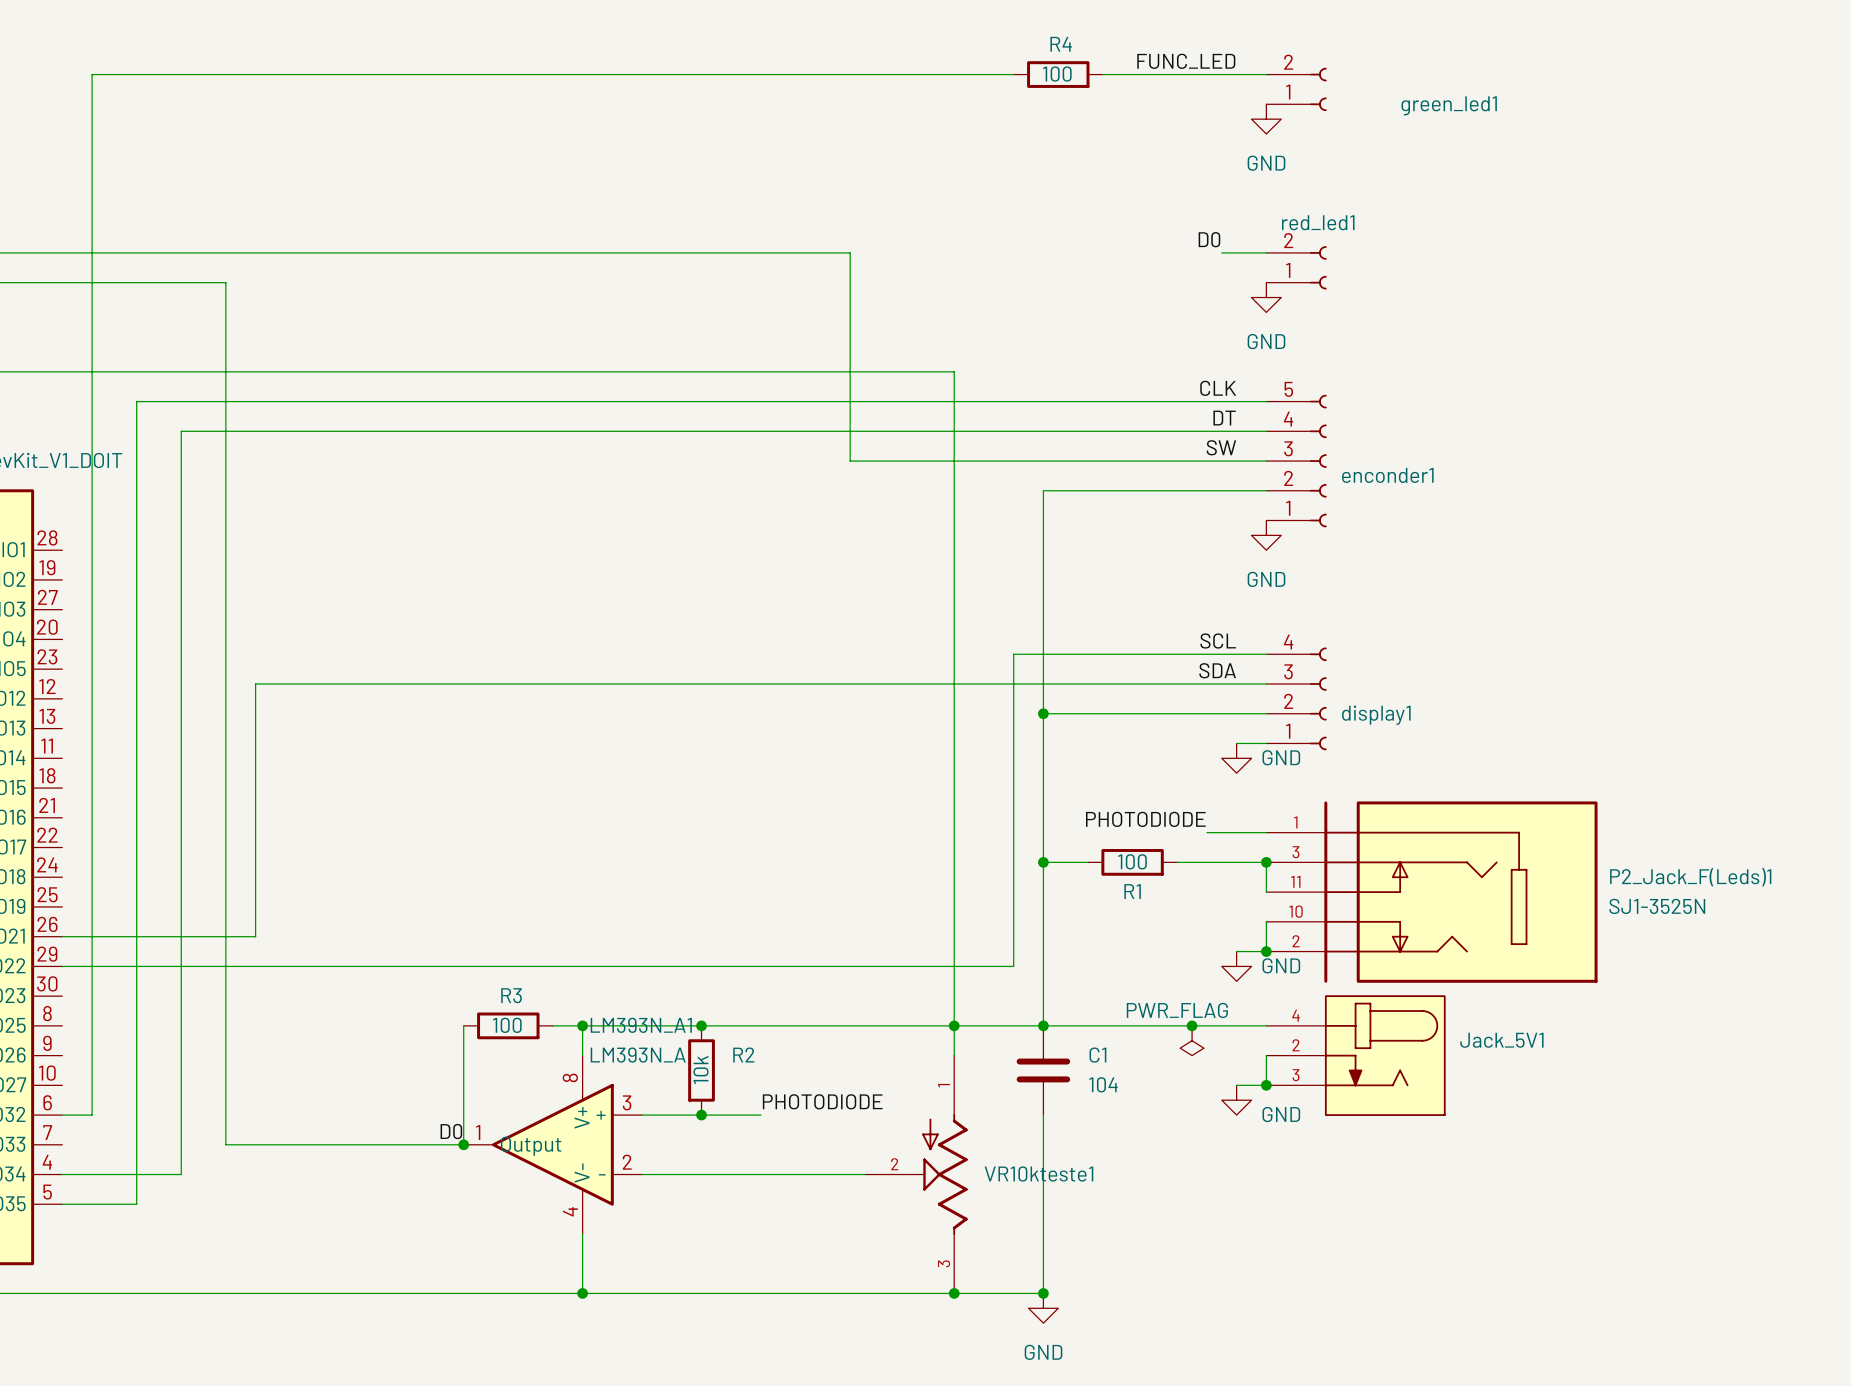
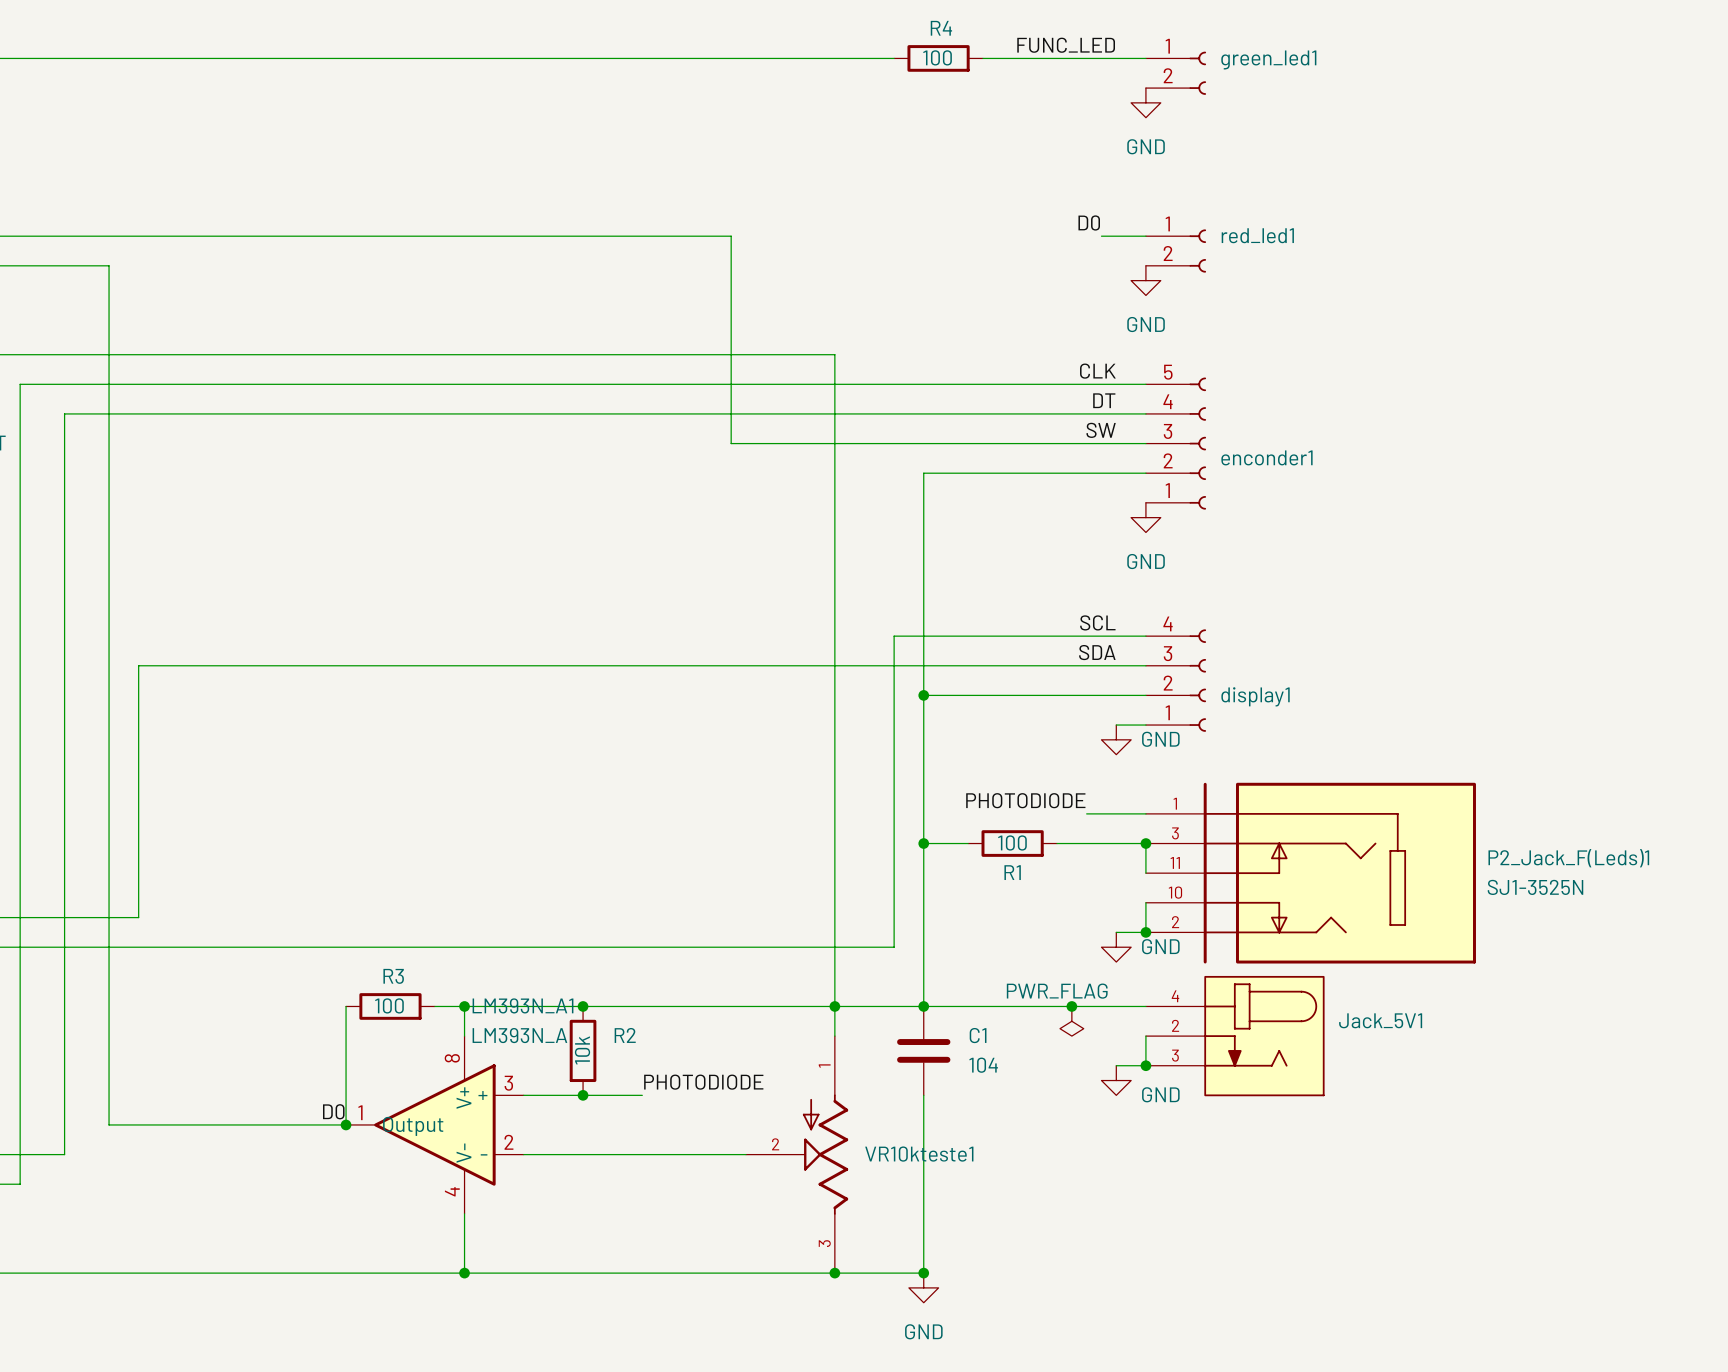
green_led1 flip: as is (1318, 89) -> up-down (1197, 73)
green_led1 name position: green_led1 (1449, 105) -> green_led1 (1268, 59)
red_led1 name position: red_led1 (1318, 222) -> red_led1 (1257, 235)
red_led1 flip: as is (1318, 267) -> up-down (1197, 251)

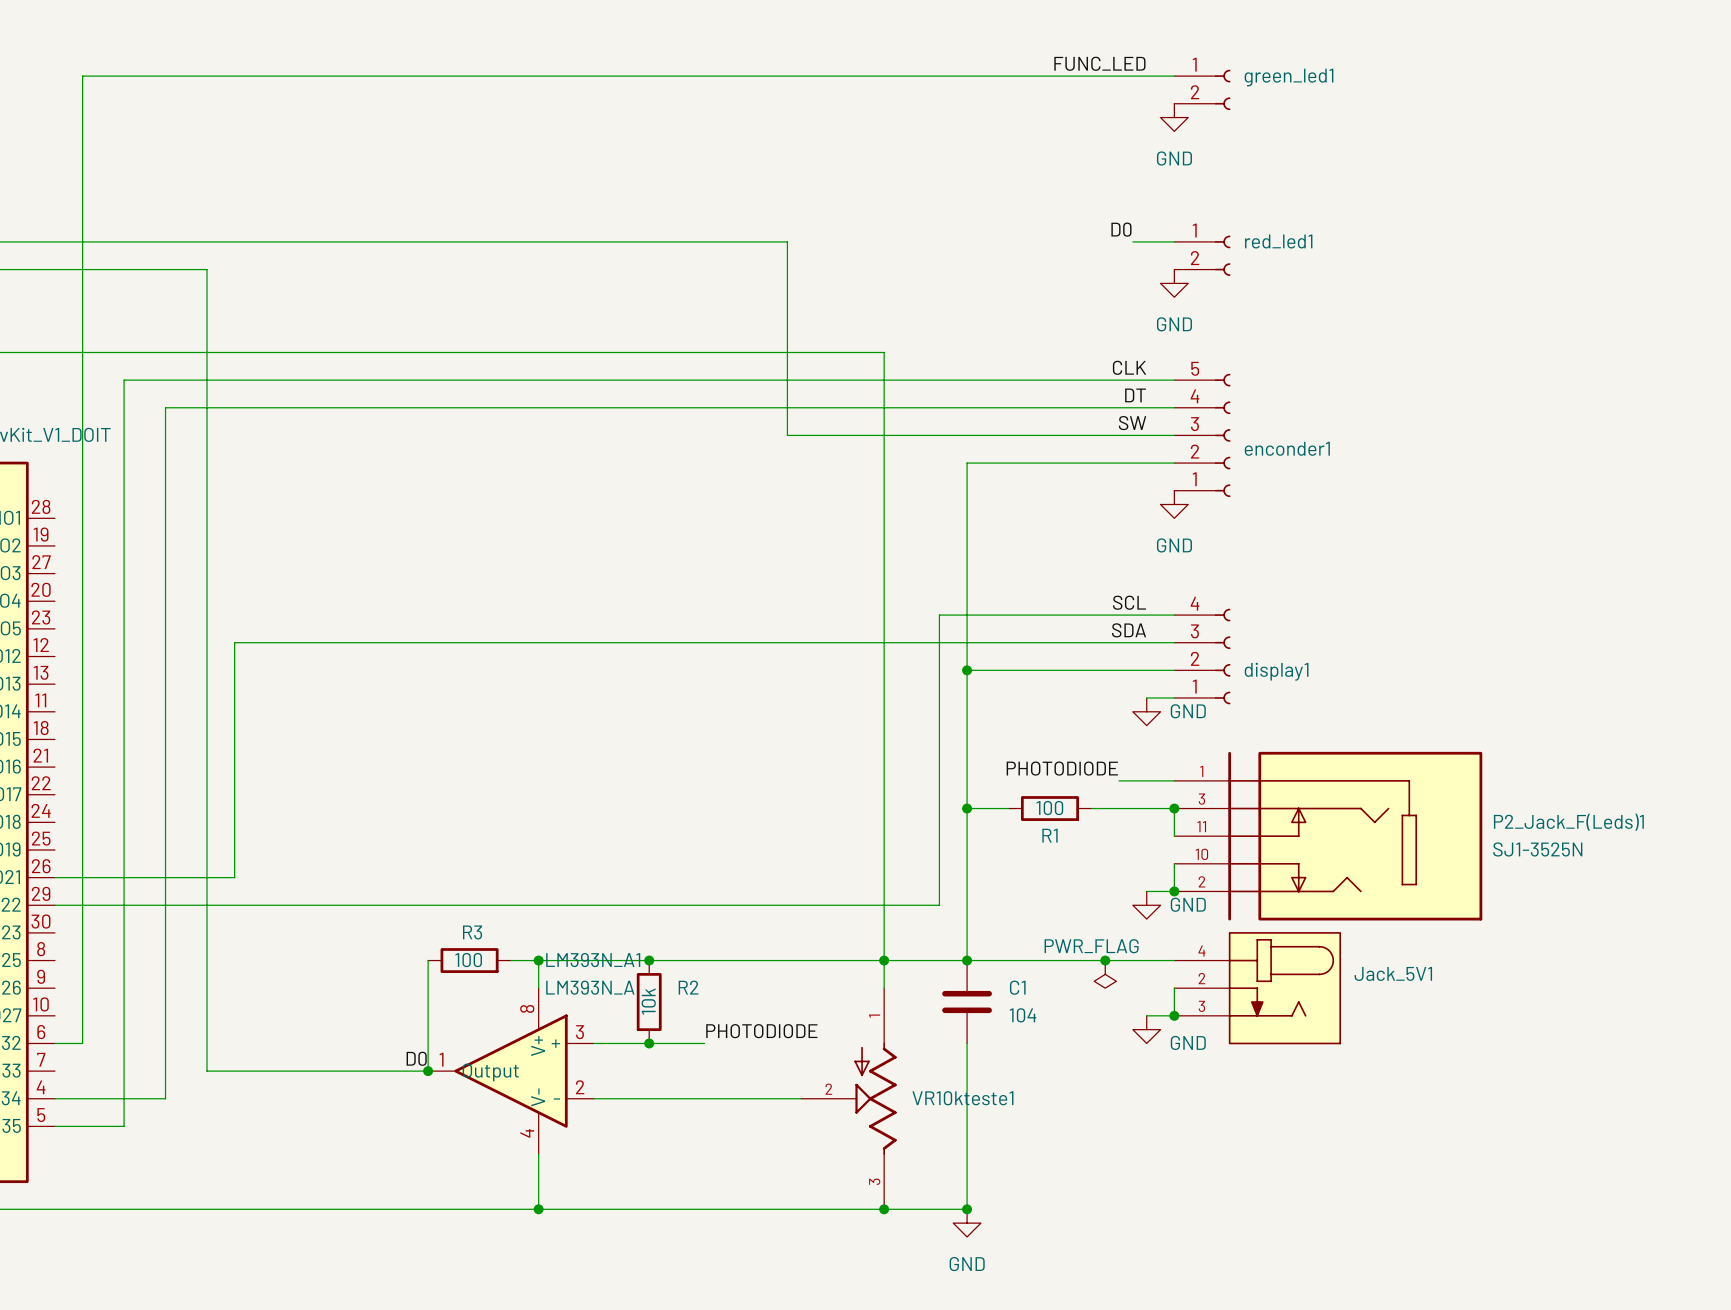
wire: none -> (939, 76) (1022, 76)
R4: 100 (938, 58) -> none

